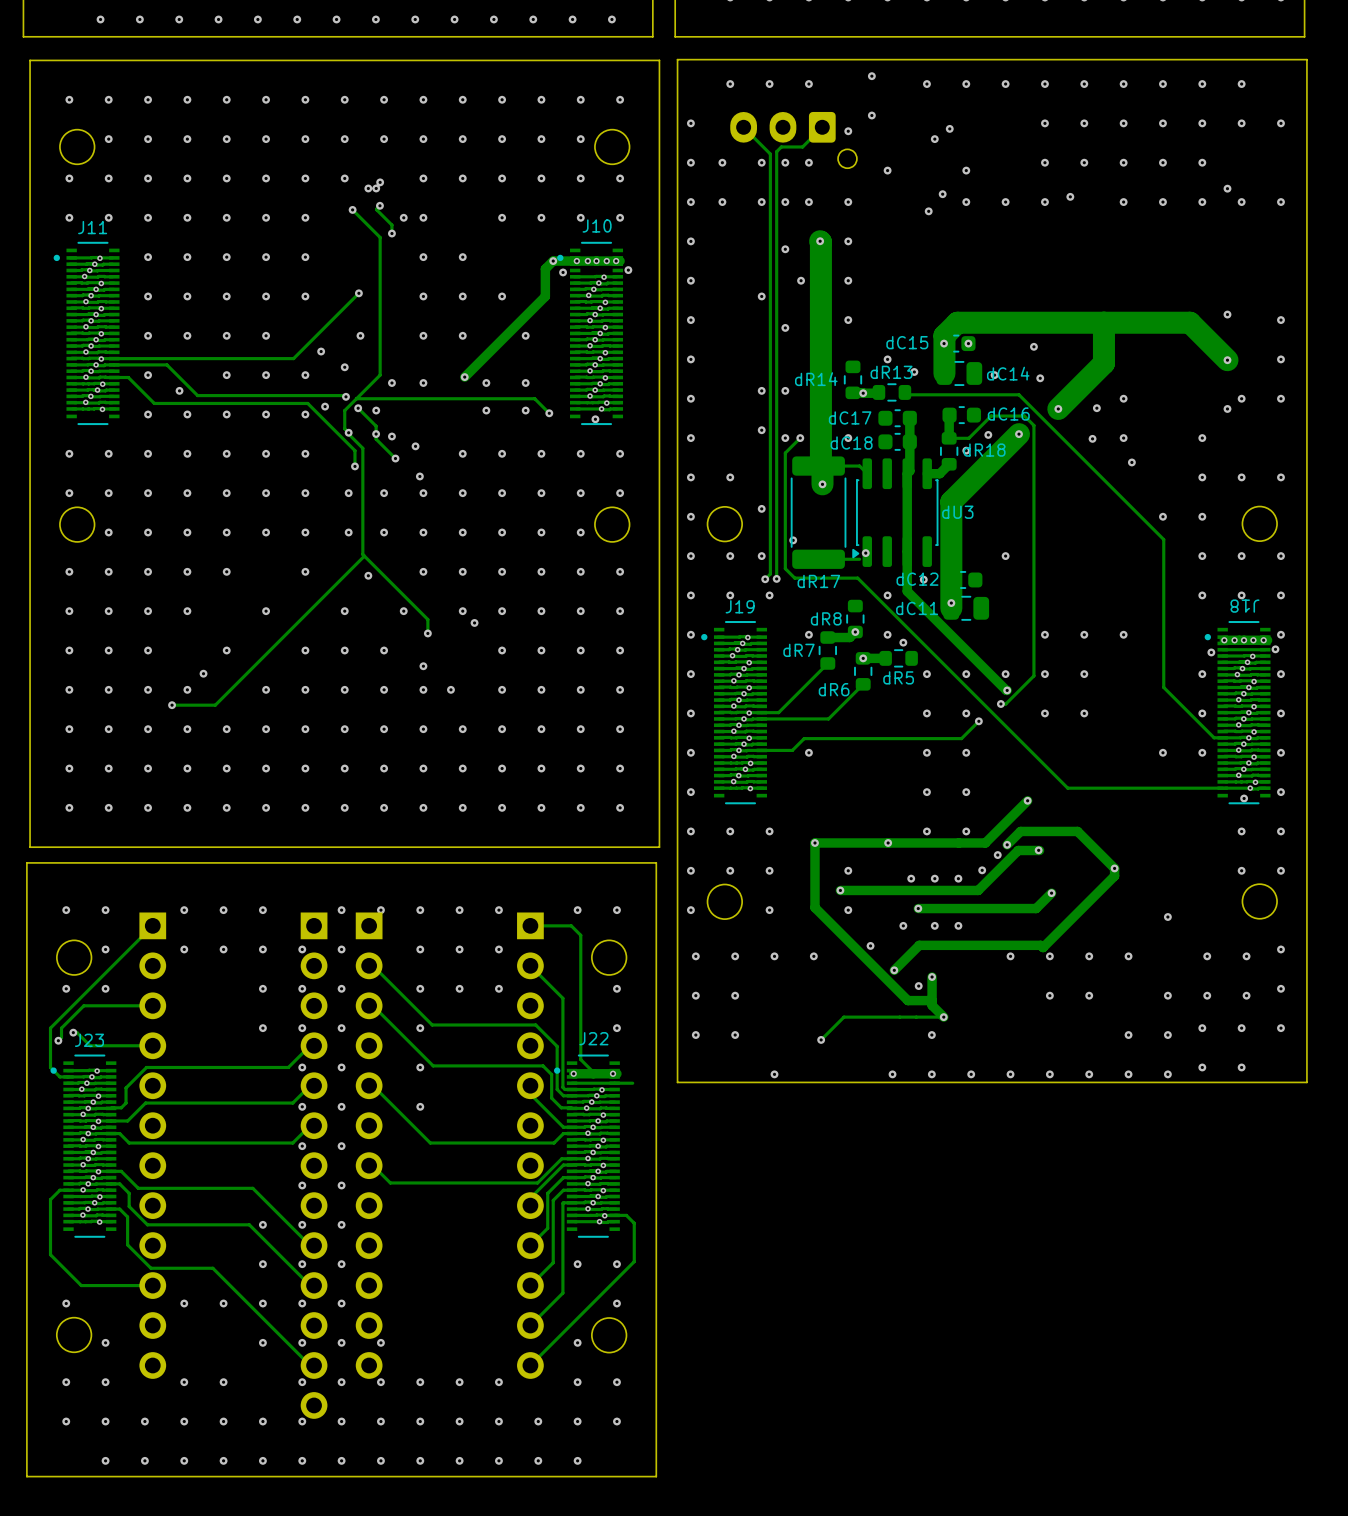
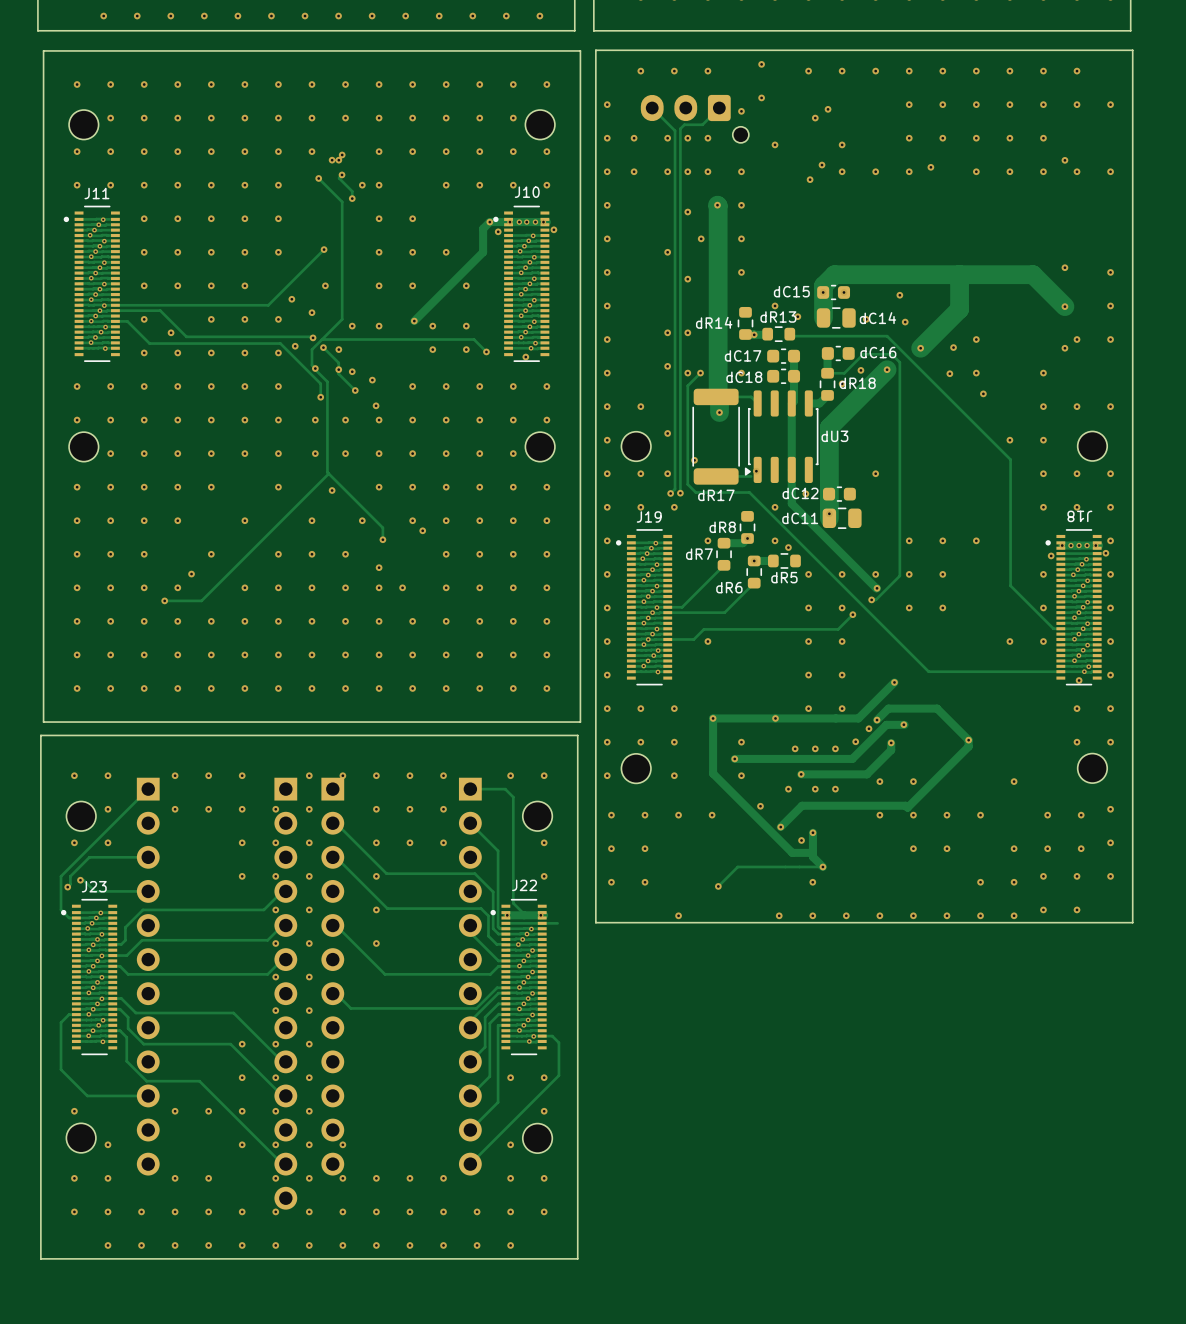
via: none -> (891, 742)
track: (1051, 893) (1036, 908) (995, 908) -> (891, 742) (891, 750) (866, 774)
via: (1051, 893) -> none
via: none -> (879, 781)
via: none -> (913, 781)

